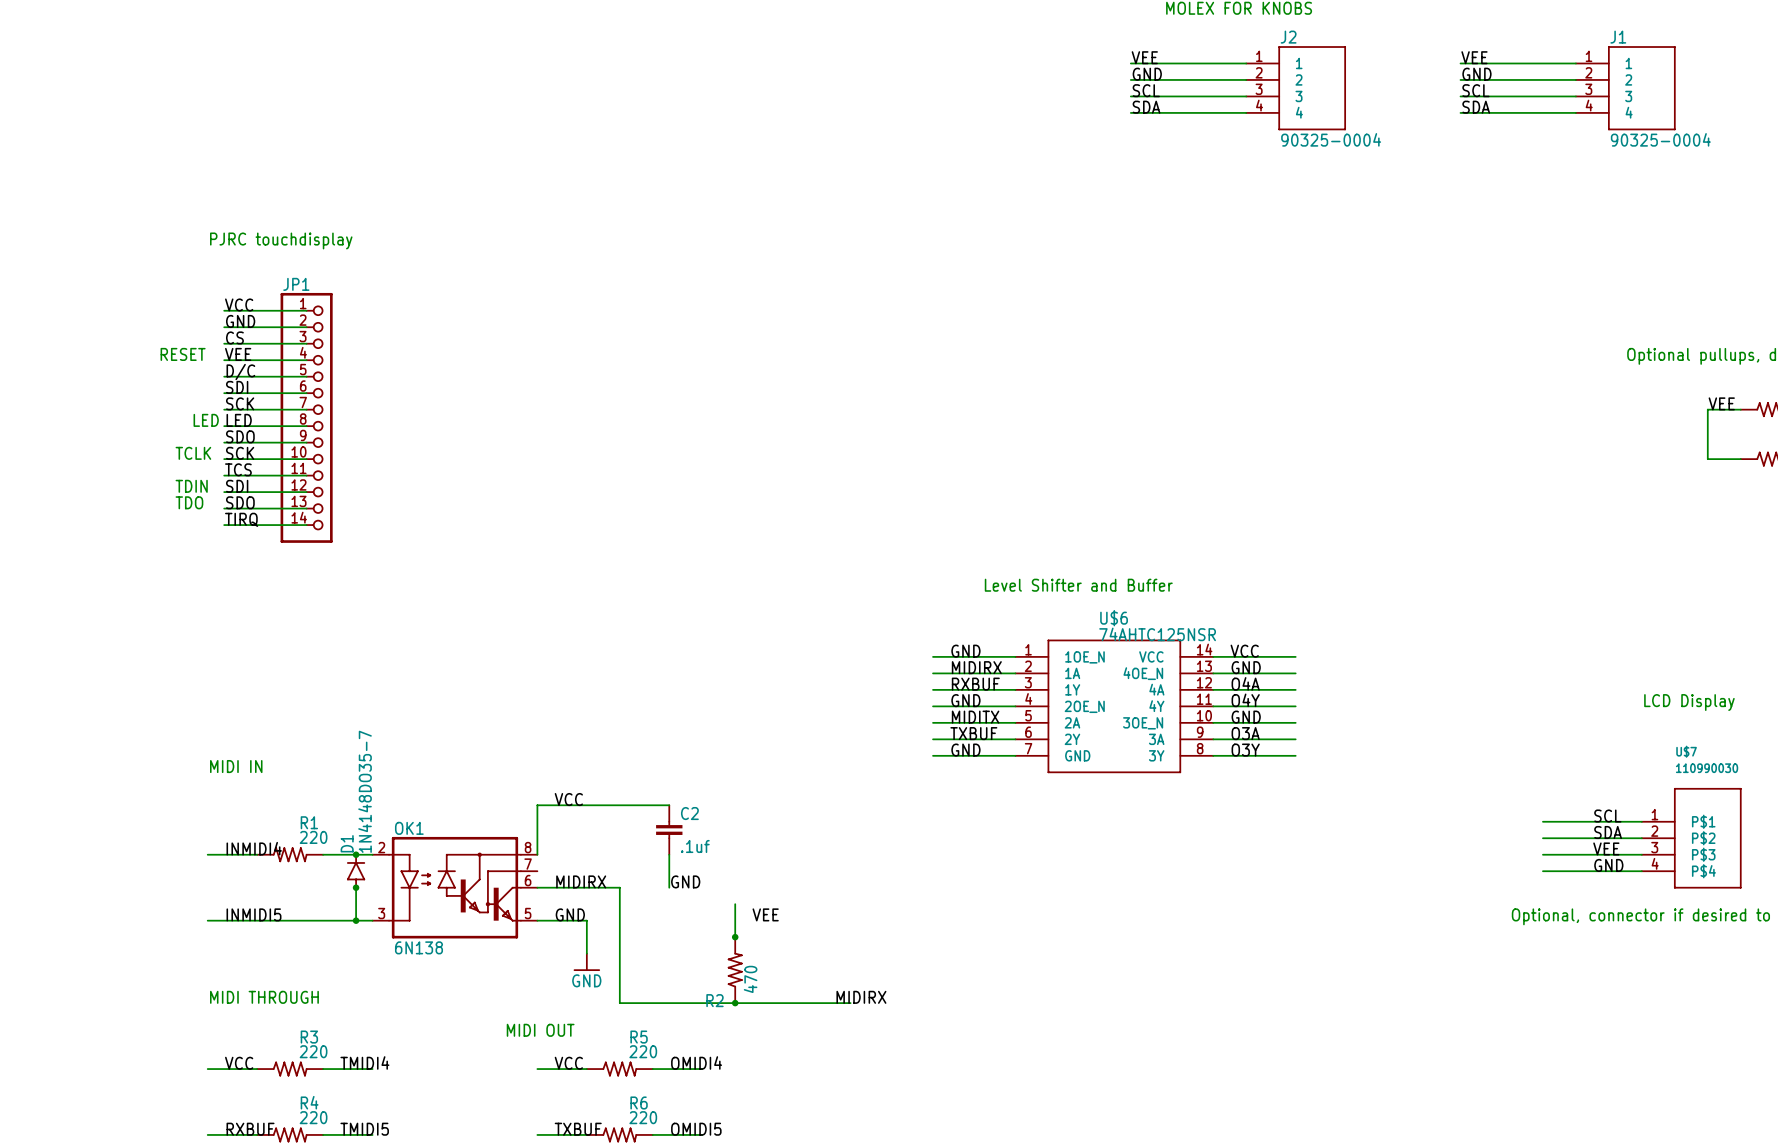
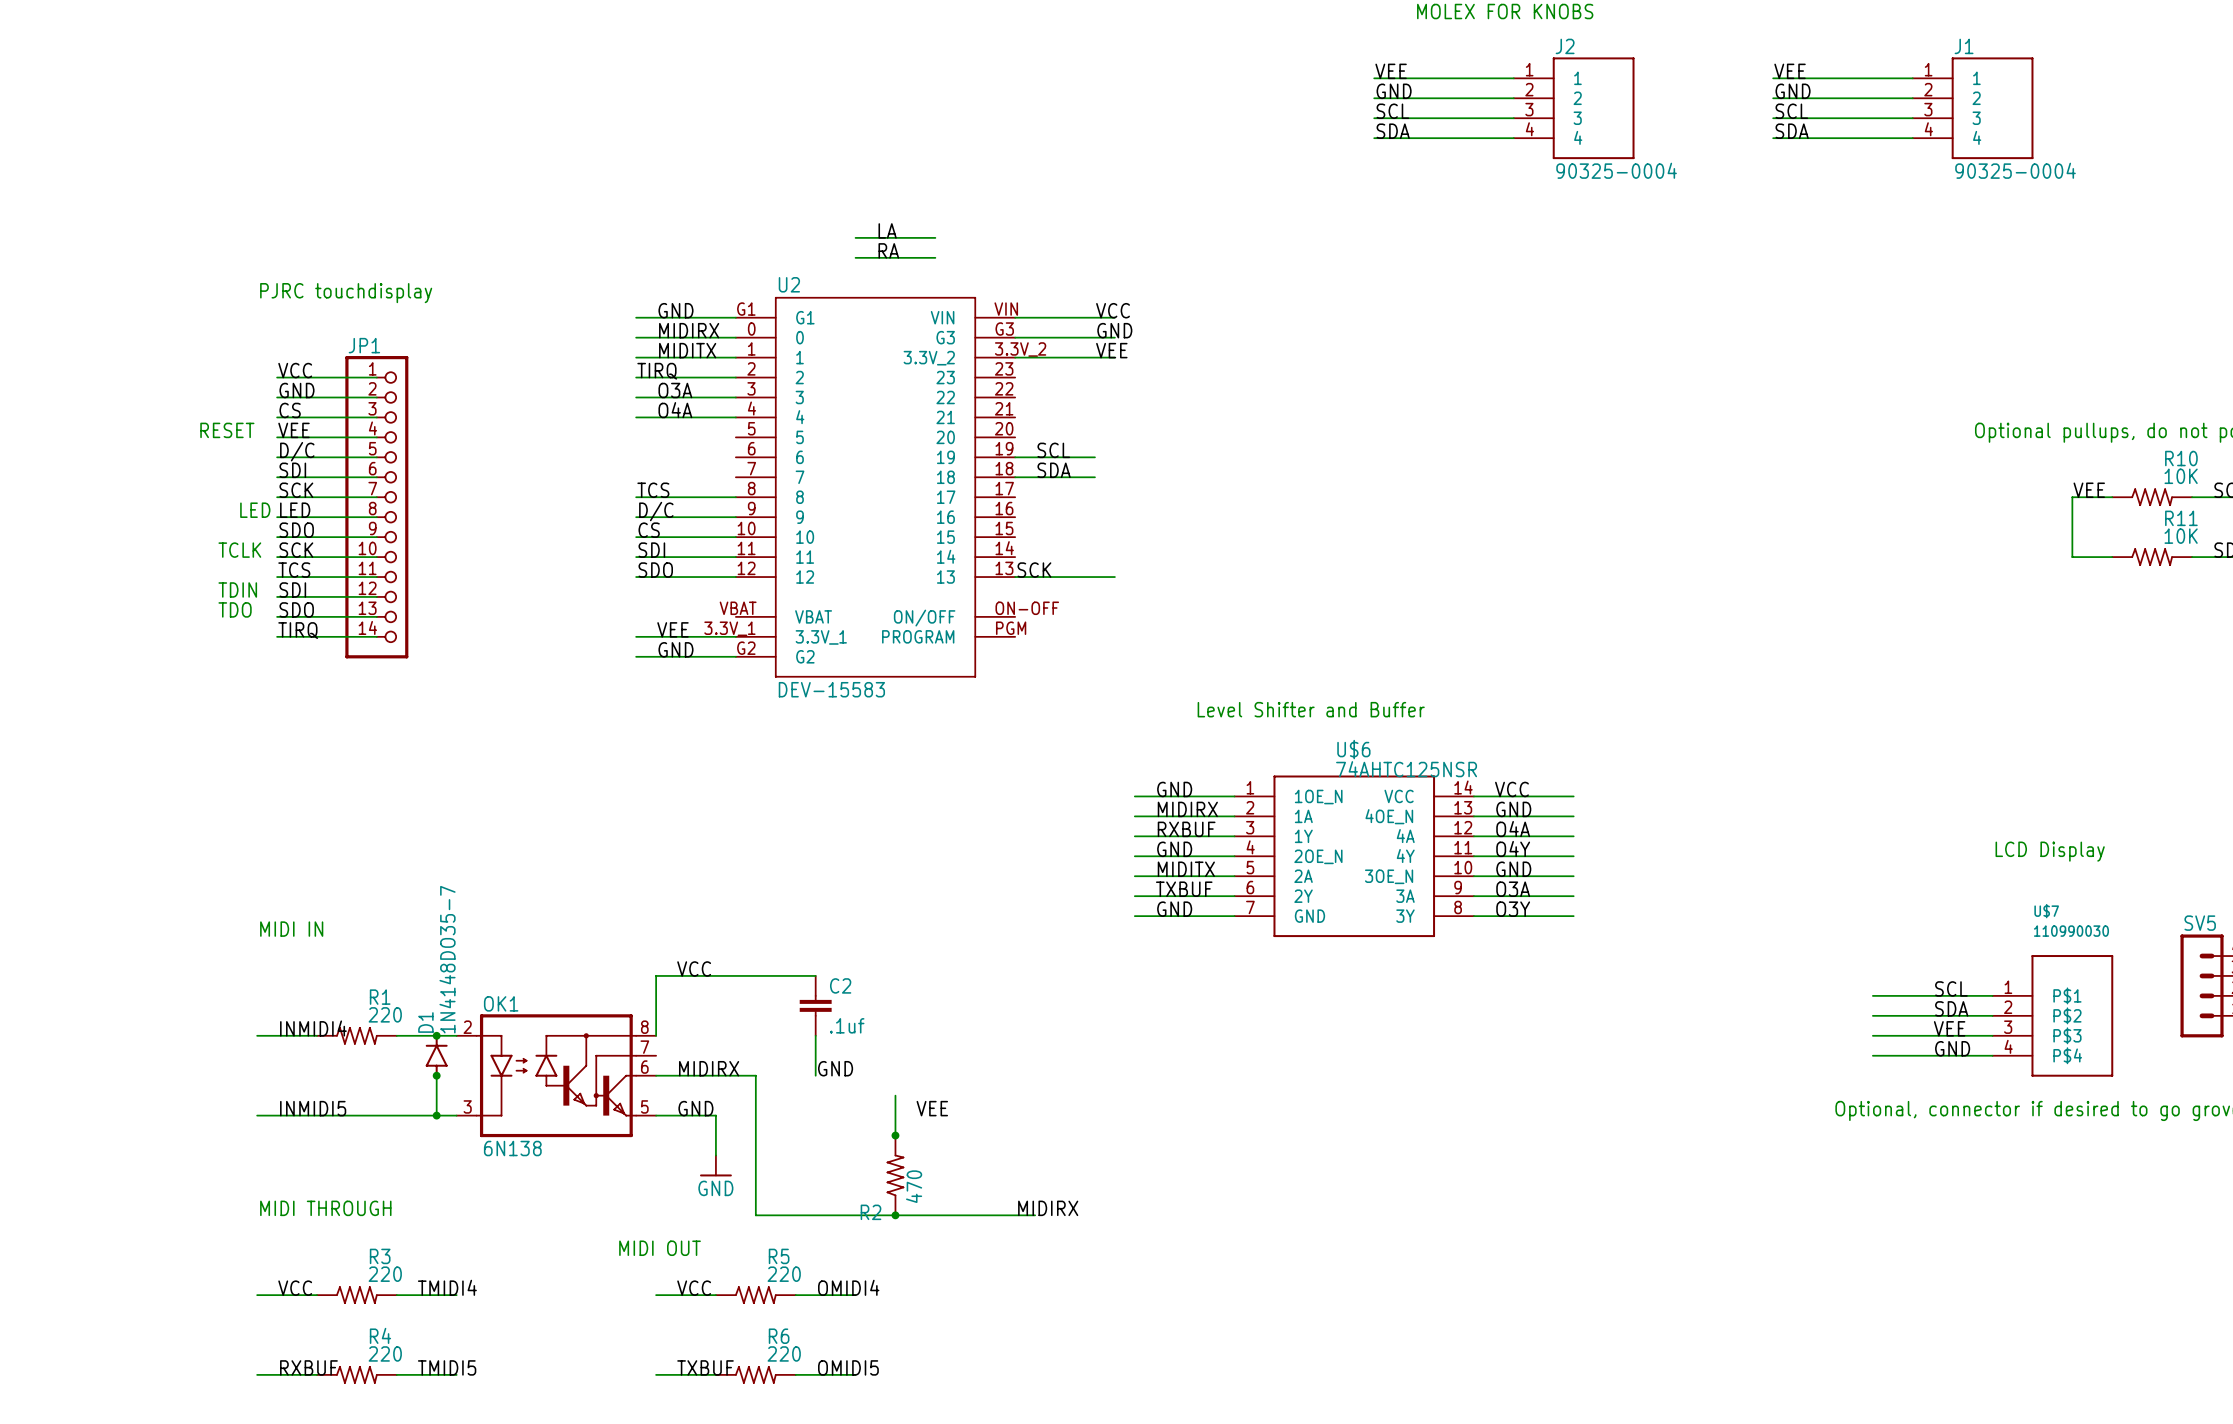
label: none -> LA (887, 230)
wire: none -> (855, 237) (935, 237)
label: none -> RA (888, 250)
wire: none -> (855, 257) (935, 257)
label: none -> GND (675, 310)
label: none -> VCC (1113, 310)
wire: none -> (636, 317) (735, 317)
wire: none -> (1015, 317) (1114, 317)
label: none -> MIDIRX (689, 330)
label: none -> GND (1114, 330)
wire: none -> (636, 337) (735, 337)
wire: none -> (1015, 337) (1114, 337)
label: none -> MIDITX (687, 350)
label: none -> VEE (1111, 350)
wire: none -> (636, 357) (735, 357)
wire: none -> (1015, 357) (1114, 357)
label: none -> TIRQ (657, 371)
wire: none -> (636, 377) (735, 377)
label: none -> O3A (675, 390)
wire: none -> (636, 397) (735, 397)
label: none -> O4A (675, 410)
wire: none -> (636, 417) (735, 417)
label: none -> SCL (1053, 450)
wire: none -> (1015, 457) (1094, 457)
label: none -> SDA (1054, 470)
wire: none -> (1015, 477) (1094, 477)
U2: none -> DEV-15583 (875, 487)
label: none -> TCS (653, 490)
wire: none -> (636, 497) (735, 497)
label: none -> D/C (656, 511)
wire: none -> (636, 517) (735, 517)
label: none -> CS (649, 530)
wire: none -> (636, 537) (735, 537)
label: none -> SDI (651, 550)
wire: none -> (636, 557) (735, 557)
label: none -> SDO (655, 570)
label: none -> SCK (1034, 570)
wire: none -> (636, 577) (735, 577)
wire: none -> (1015, 577) (1114, 577)
label: none -> VEE (672, 629)
wire: none -> (636, 636) (735, 636)
label: none -> GND (675, 649)
wire: none -> (636, 656) (735, 656)

